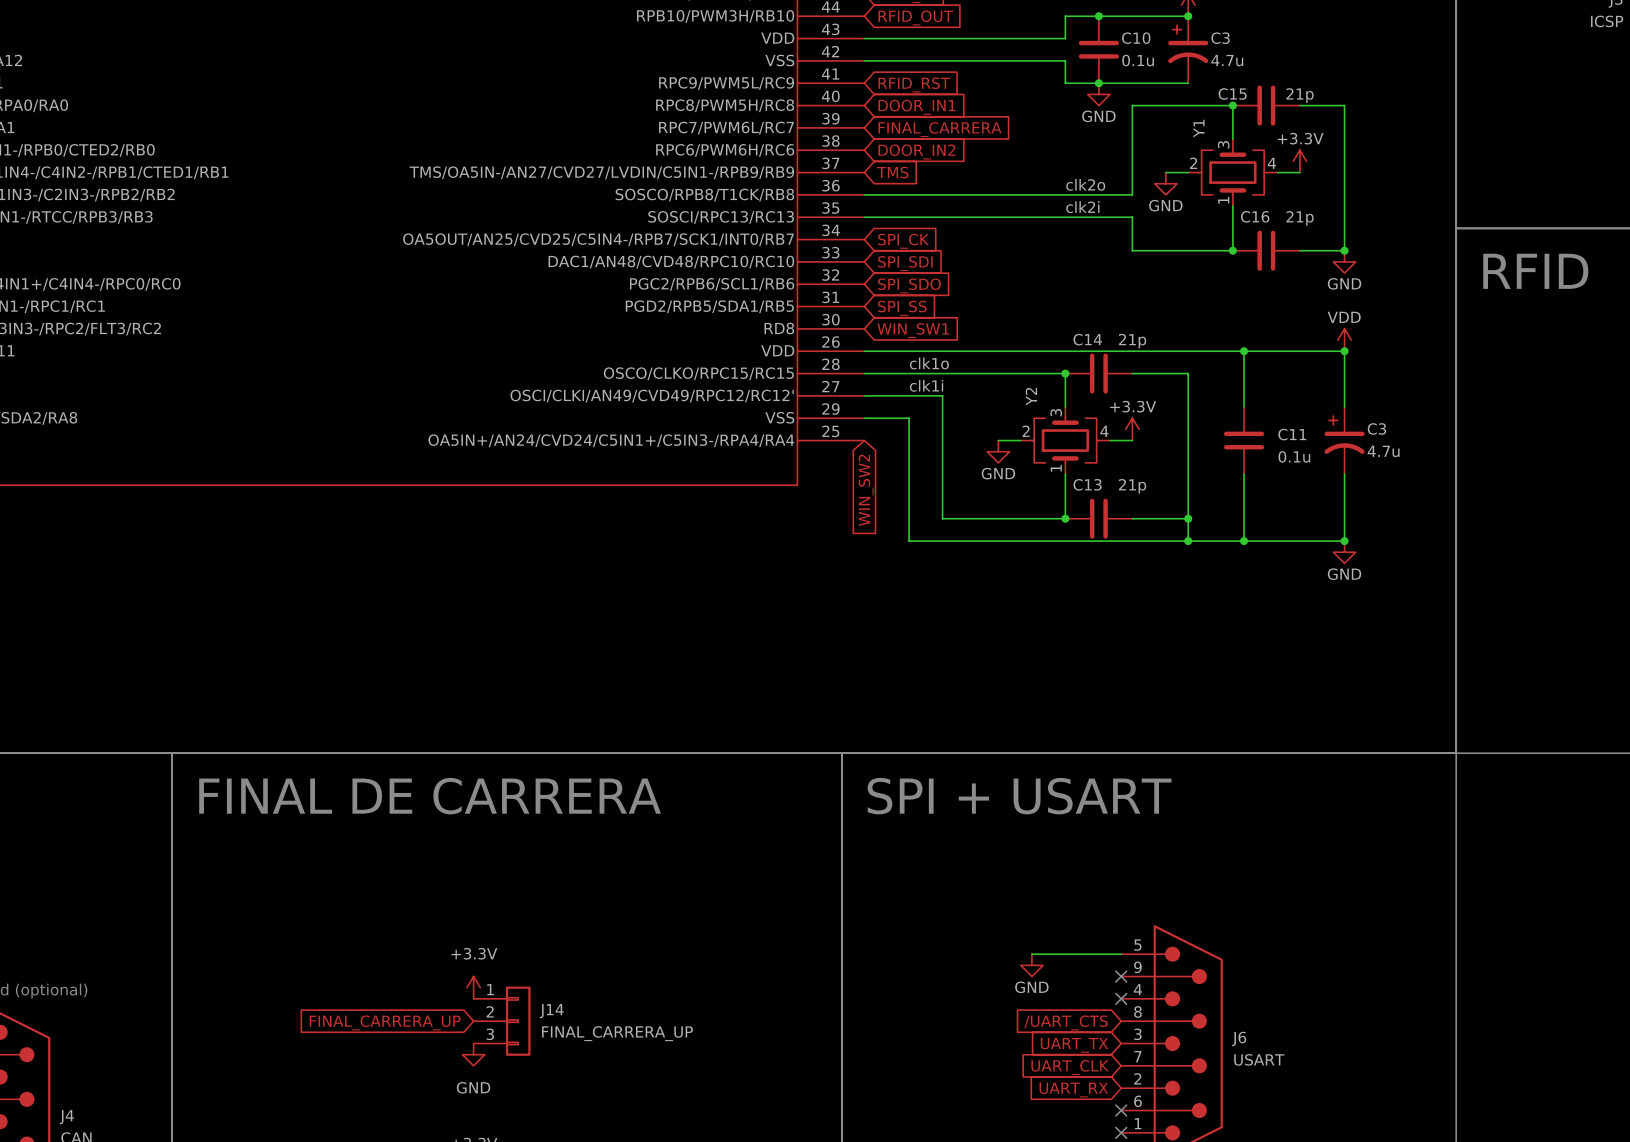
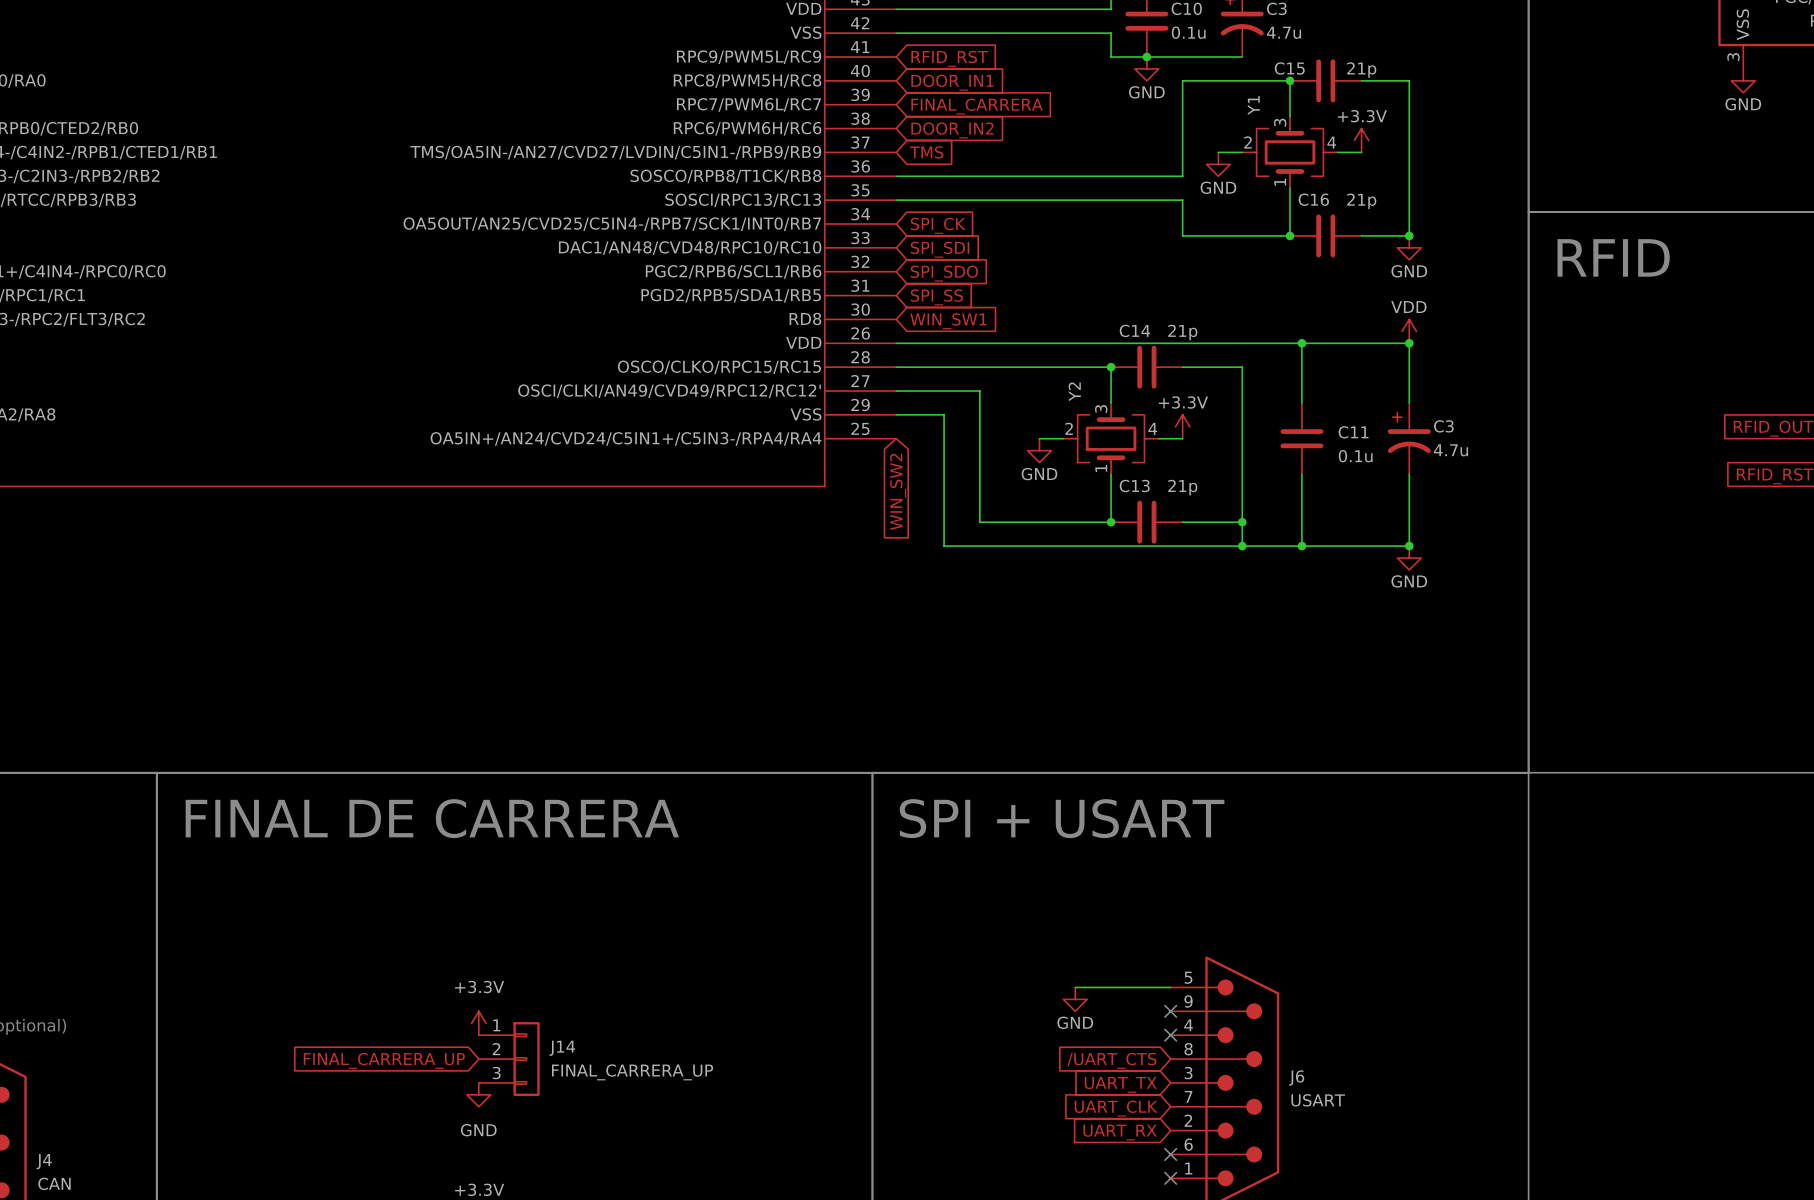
label: clk2o (1085, 184) -> none
label: clk2i (1082, 207) -> none
label: clk1o (929, 363) -> none
label: clk1i (926, 385) -> none

